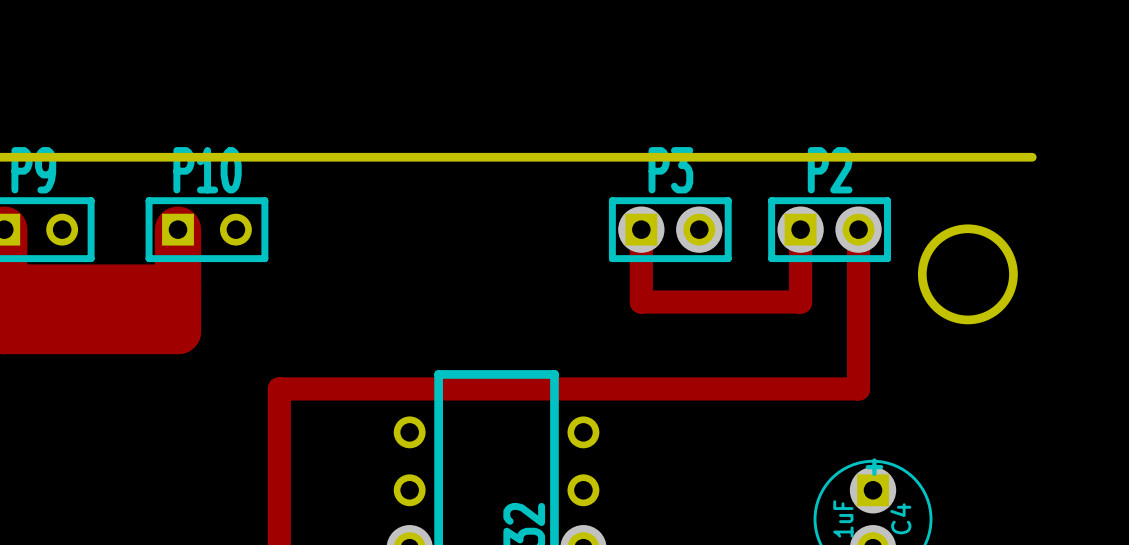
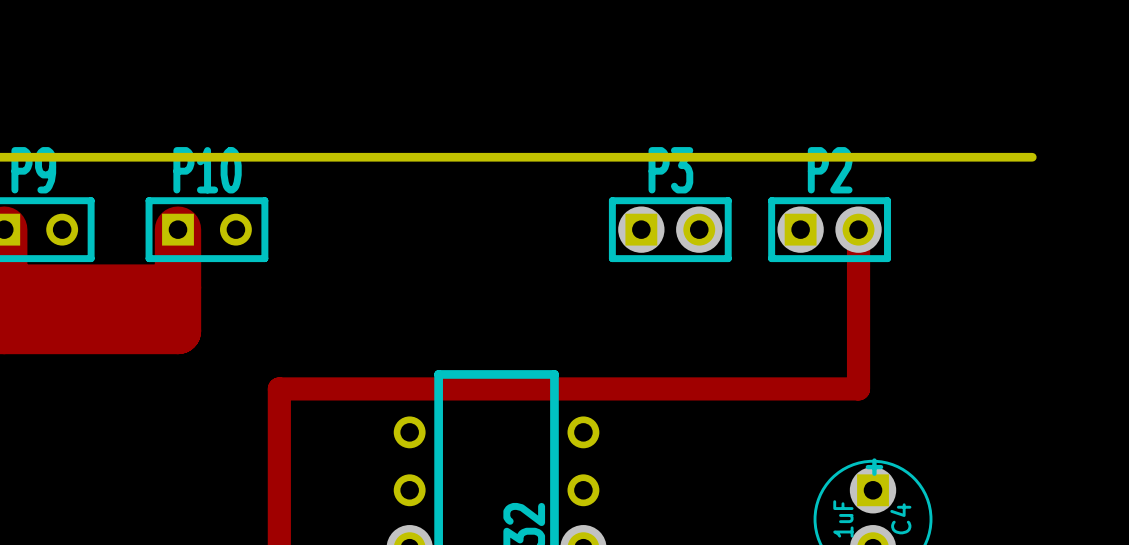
round board edge: [917, 224, 1018, 325] -> none
track: (641, 229) (641, 302) (800, 302) (800, 229) -> none

